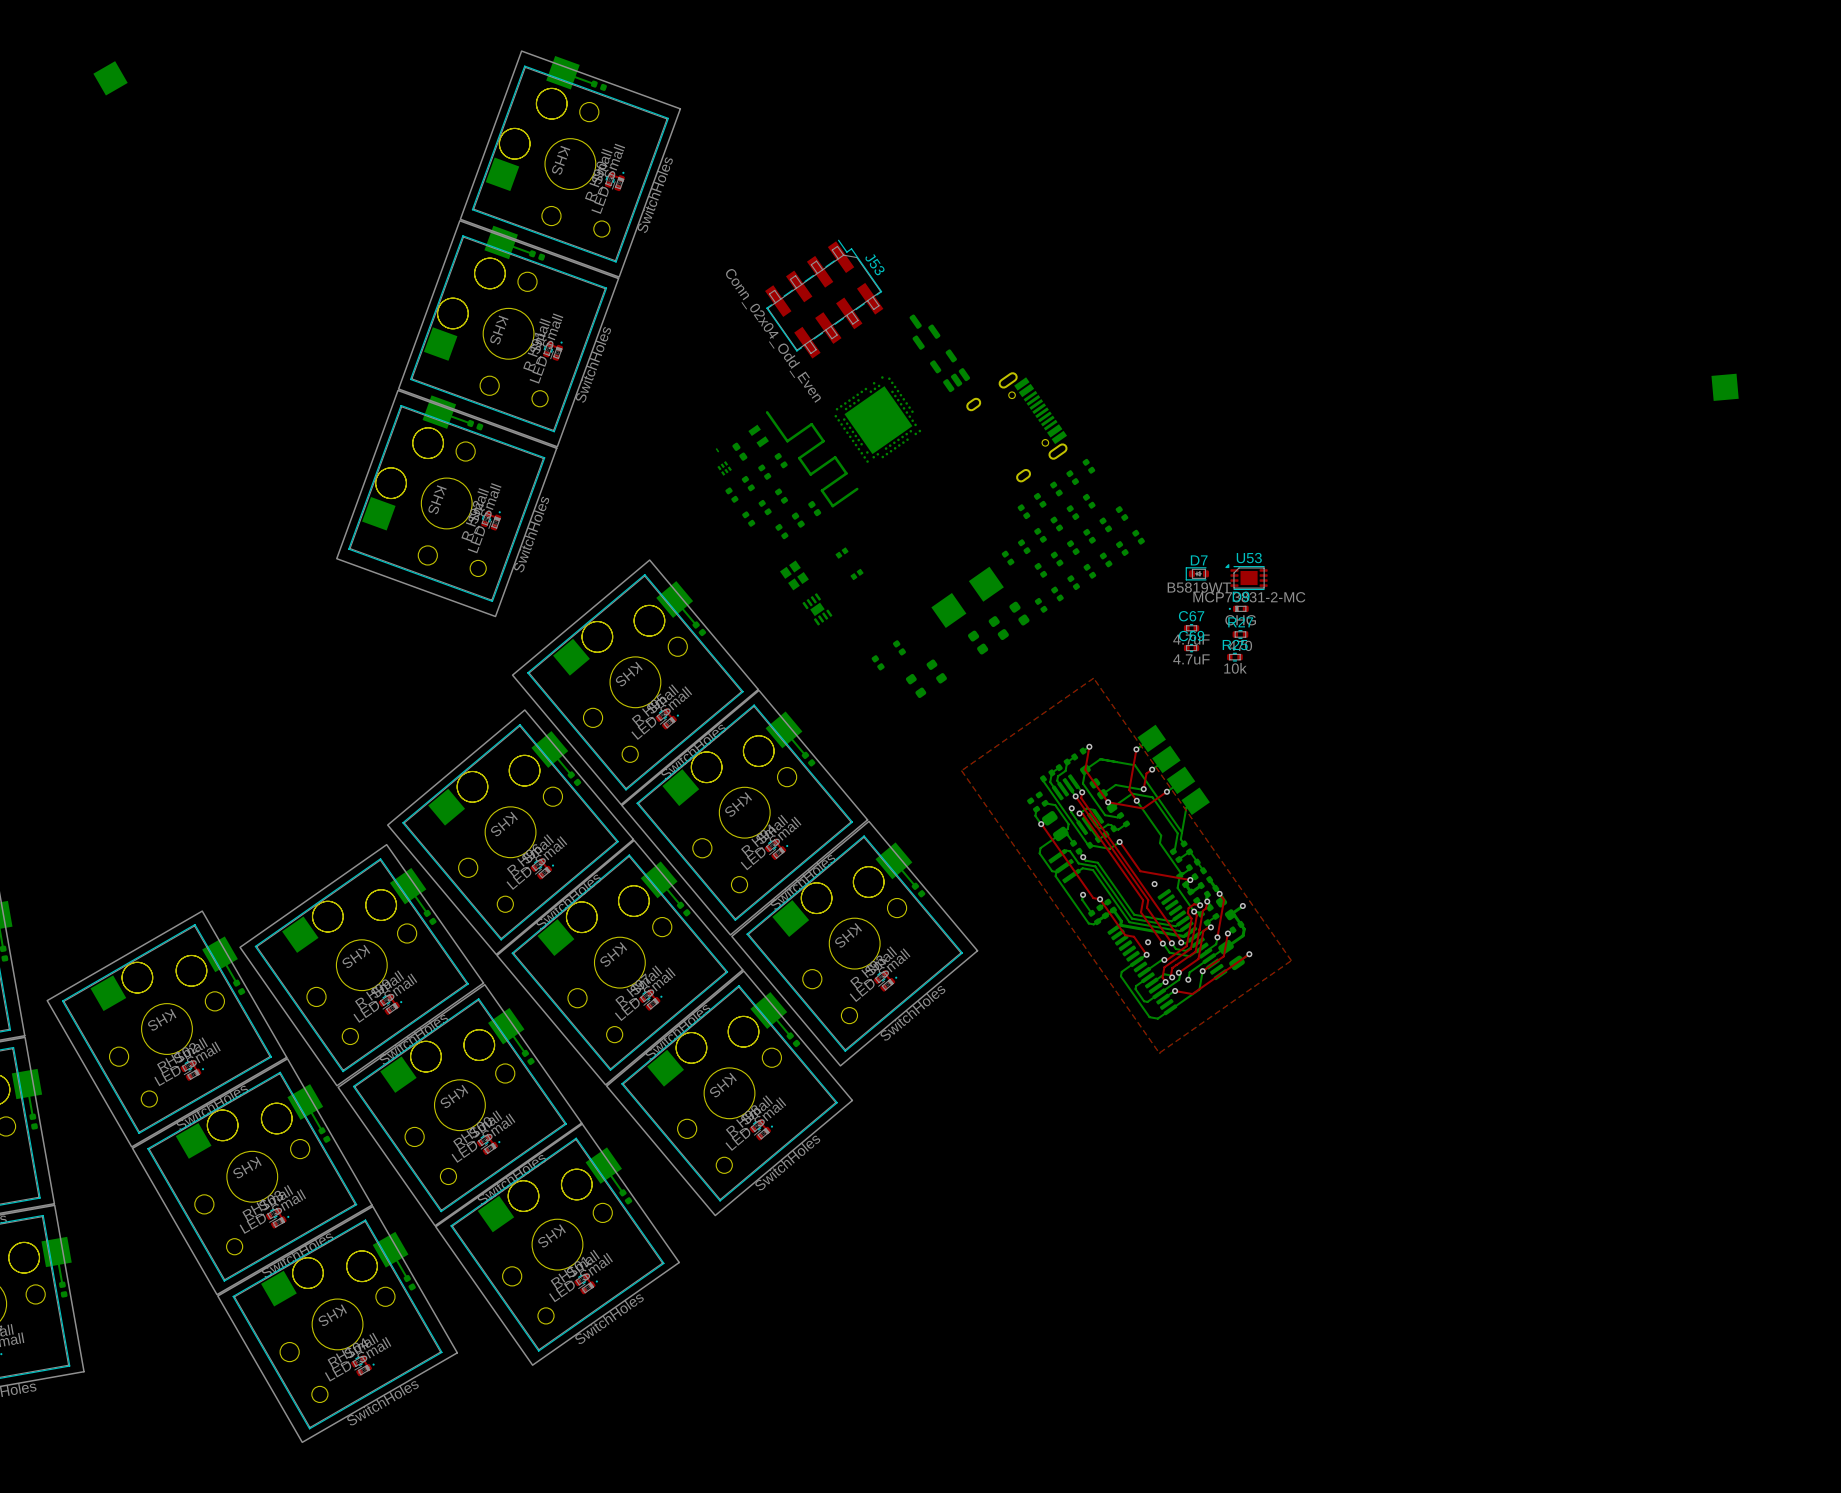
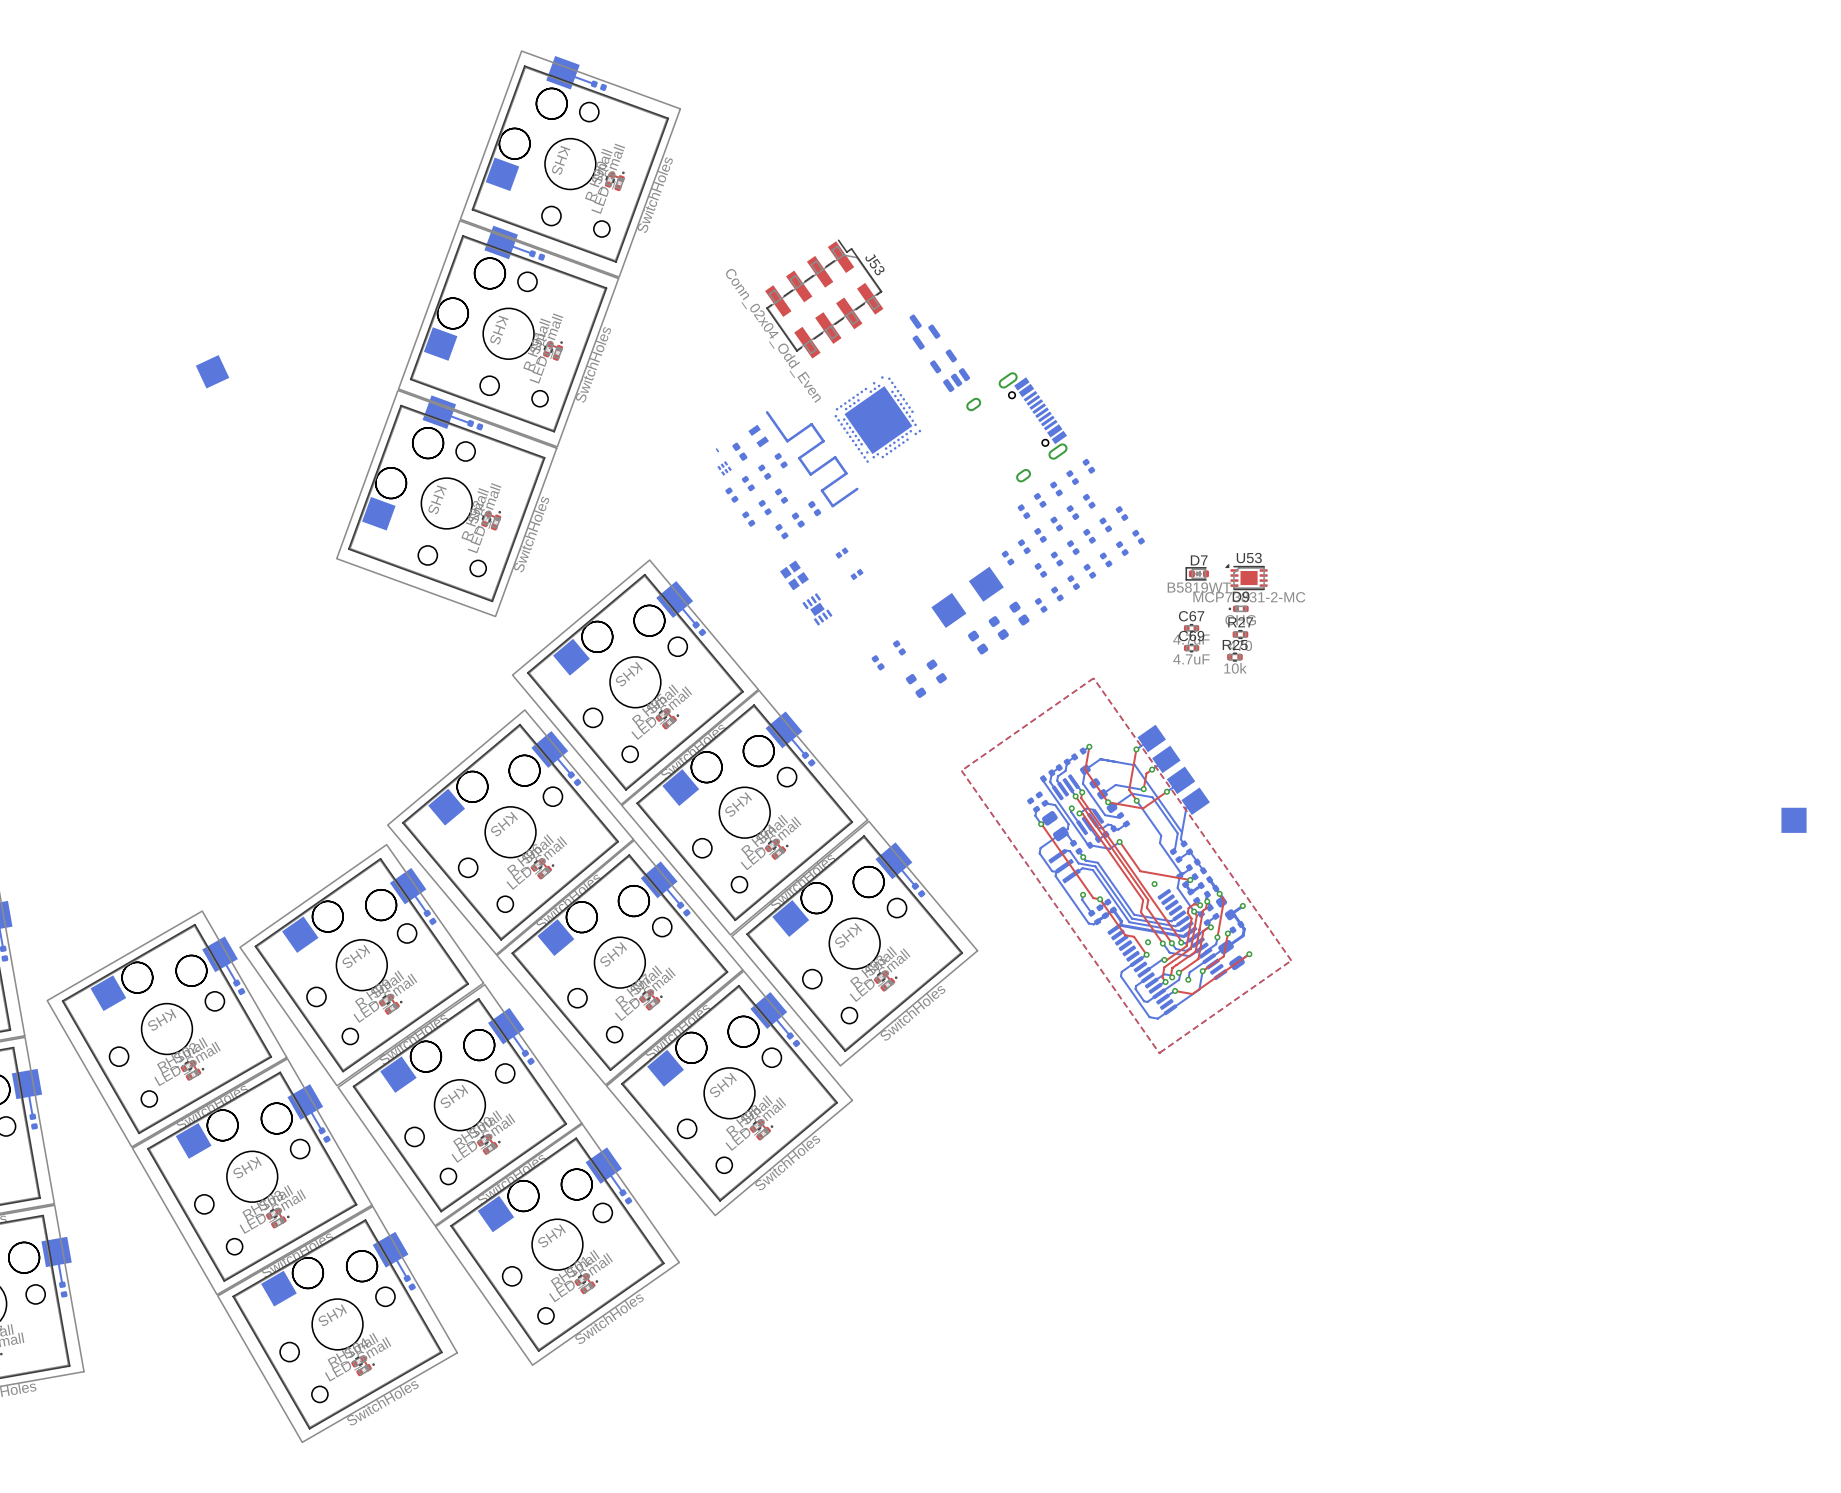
part: (110, 78) -> none
part: none -> (212, 371)
part: (1725, 387) -> none
part: none -> (1794, 820)

